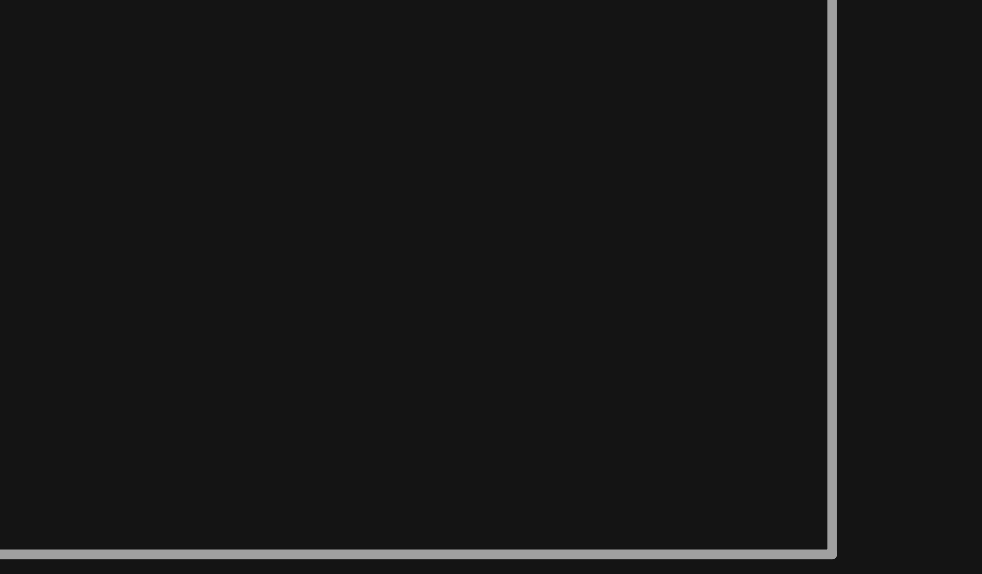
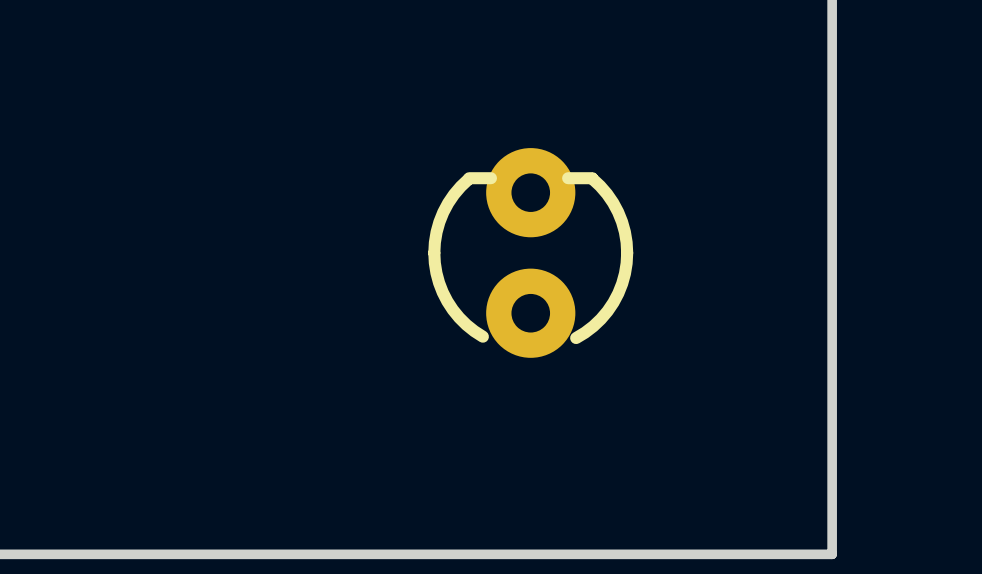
part: none -> (530, 252)

